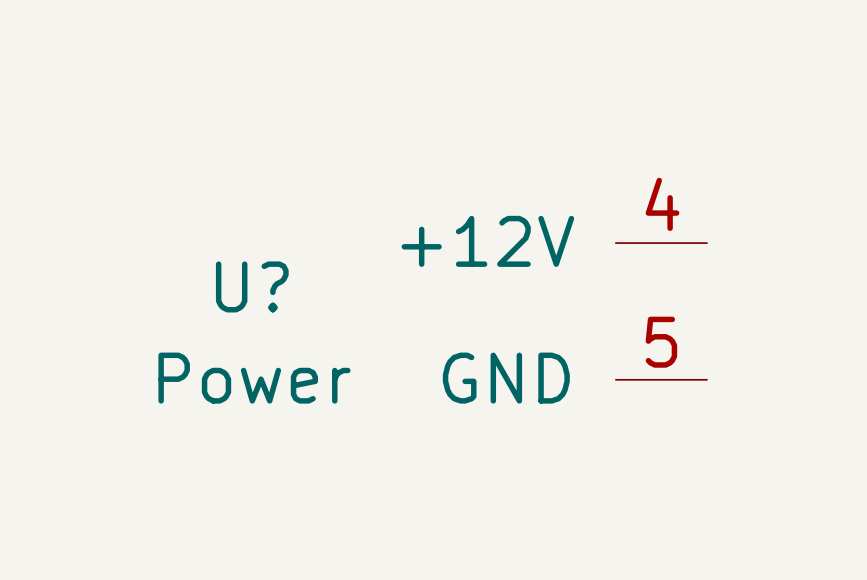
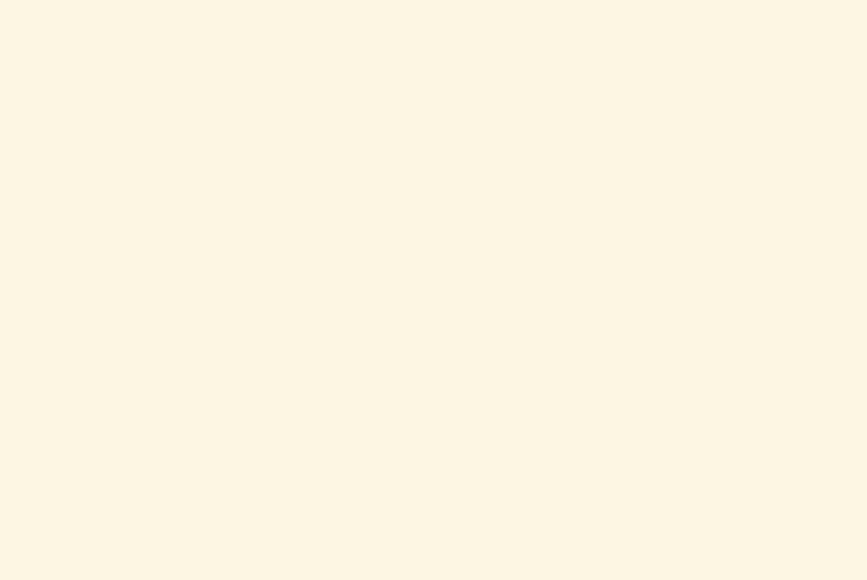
U?: Power (661, 311) -> none

